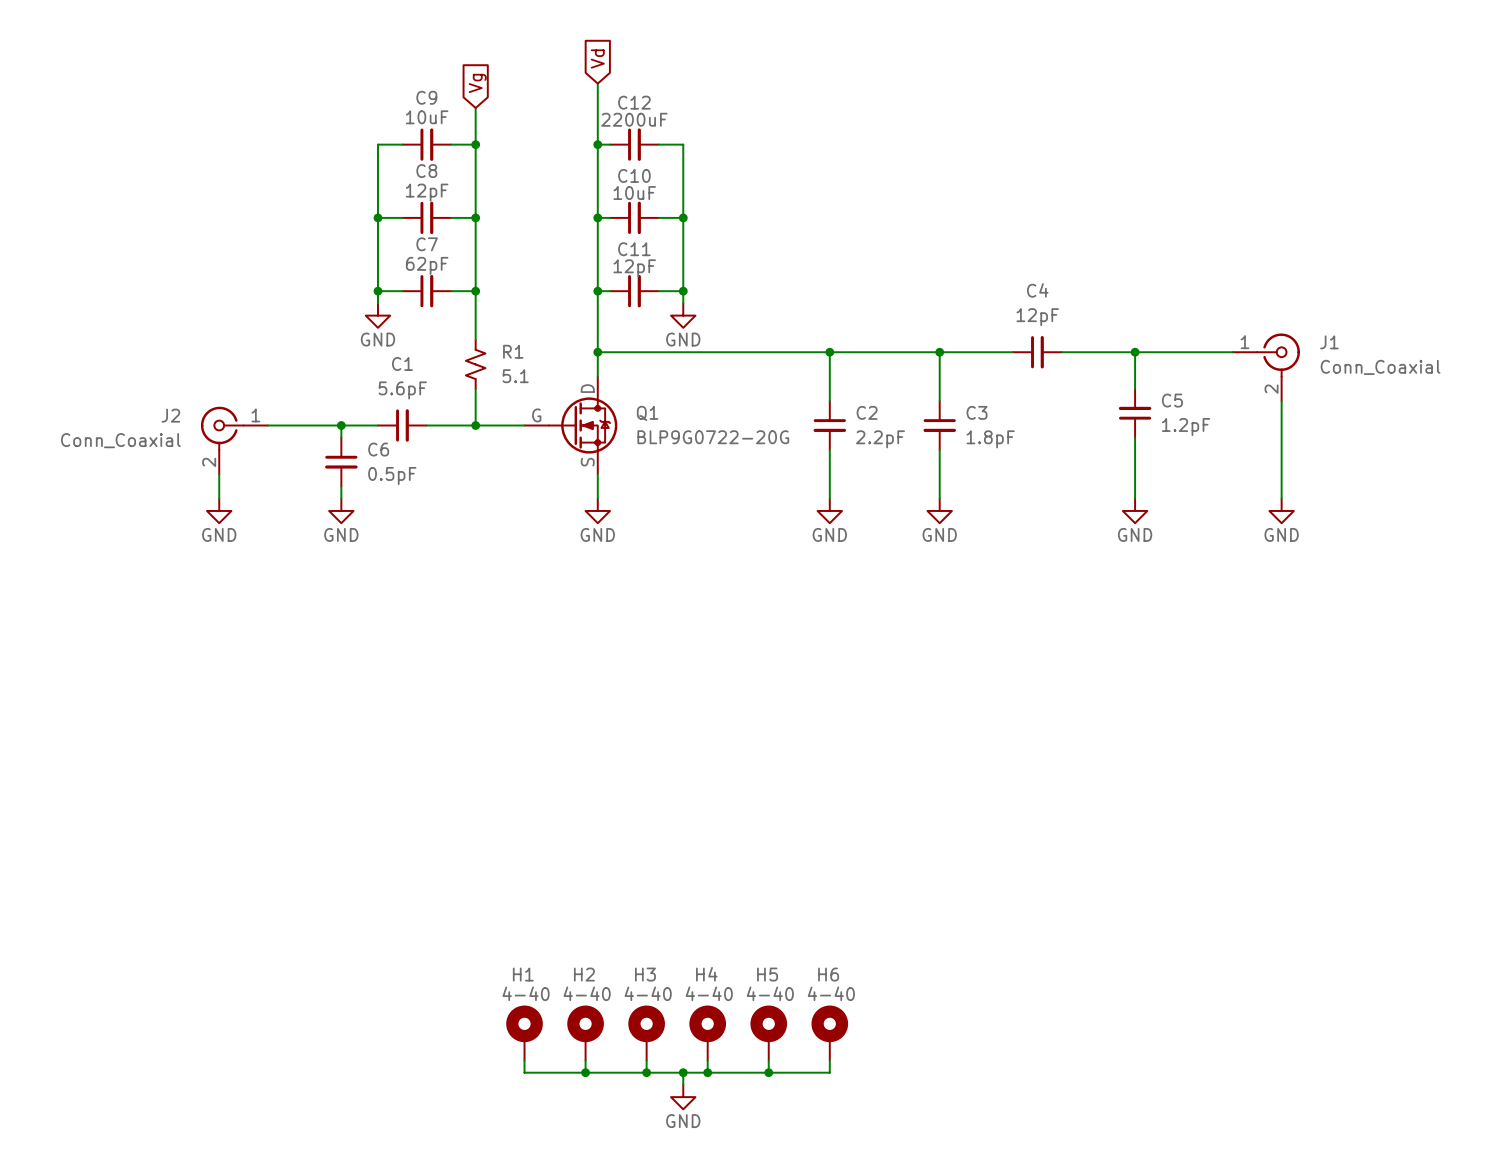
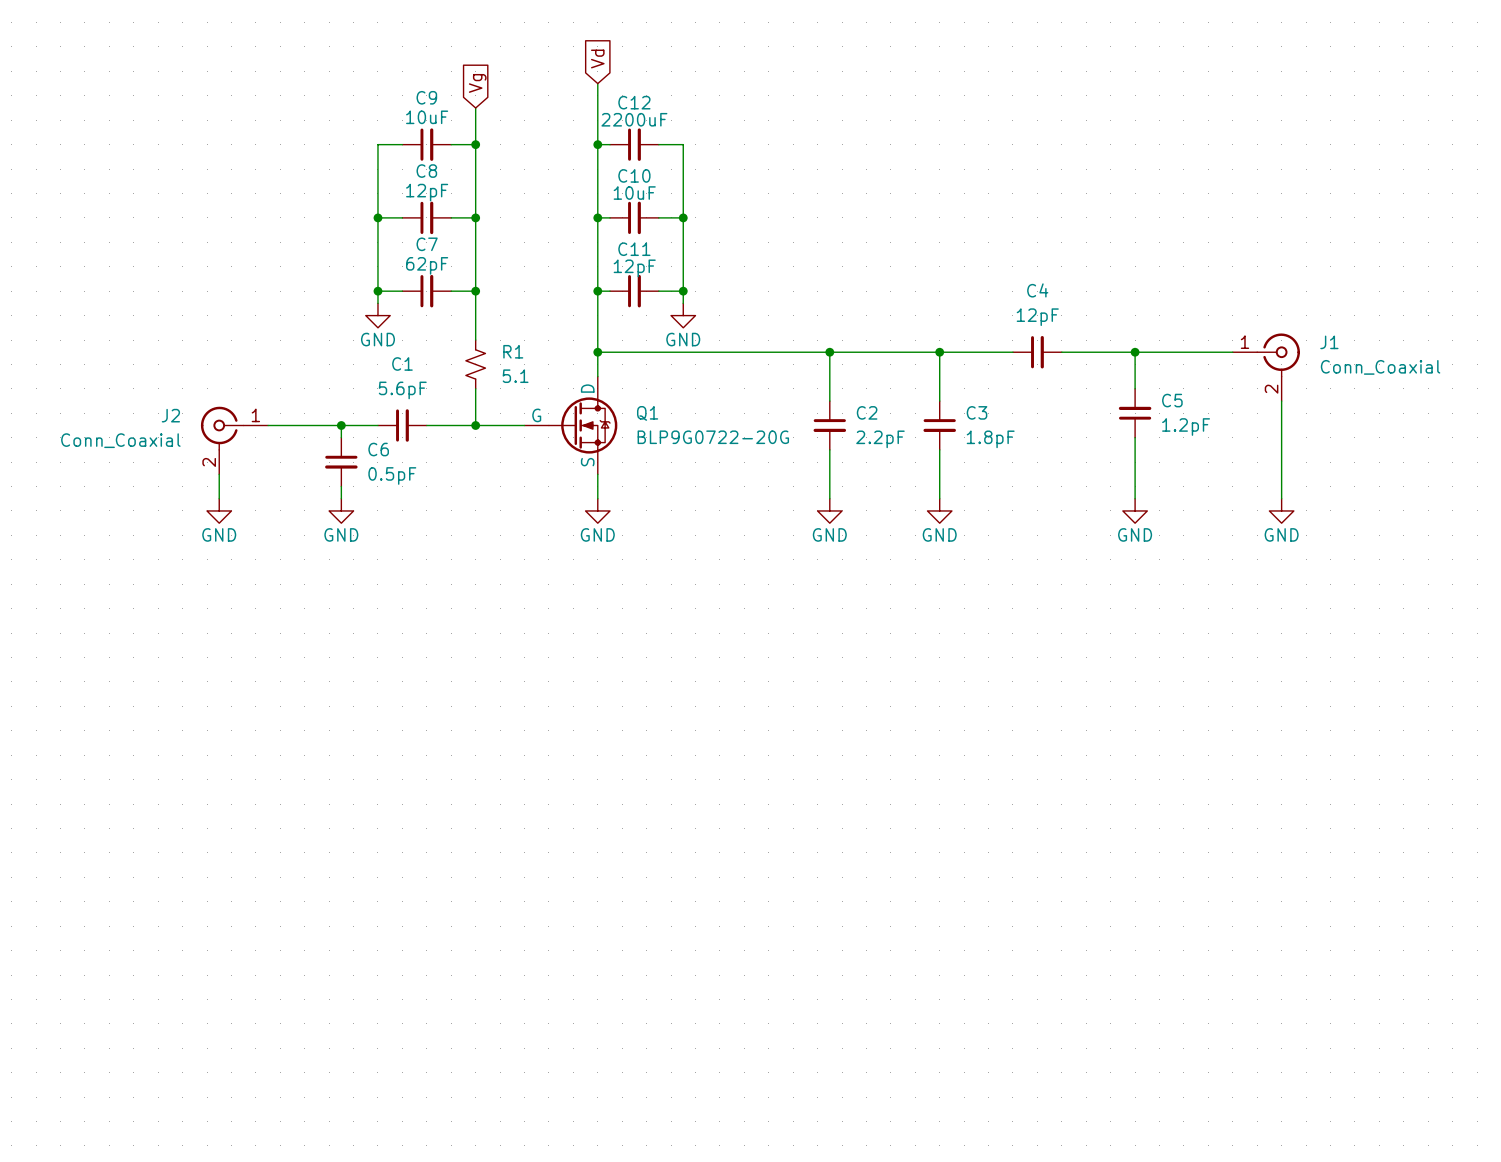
H1: 4-40 (524, 1033) -> none
H2: 4-40 (585, 1033) -> none
H3: 4-40 (646, 1033) -> none
H4: 4-40 (707, 1033) -> none
H5: 4-40 (768, 1033) -> none
H6: 4-40 (829, 1033) -> none
wire: (524, 1060) (524, 1072) (829, 1072) (829, 1060) -> none
wire: (585, 1060) (585, 1072) -> none
wire: (646, 1060) (646, 1072) -> none
wire: (707, 1060) (707, 1072) -> none
wire: (768, 1060) (768, 1072) -> none
junction: (585, 1072) -> none
junction: (646, 1072) -> none
wire: (683, 1072) (683, 1084) -> none
junction: (683, 1072) -> none
junction: (707, 1072) -> none
junction: (768, 1072) -> none
power symbol: GND (683, 1097) -> none

